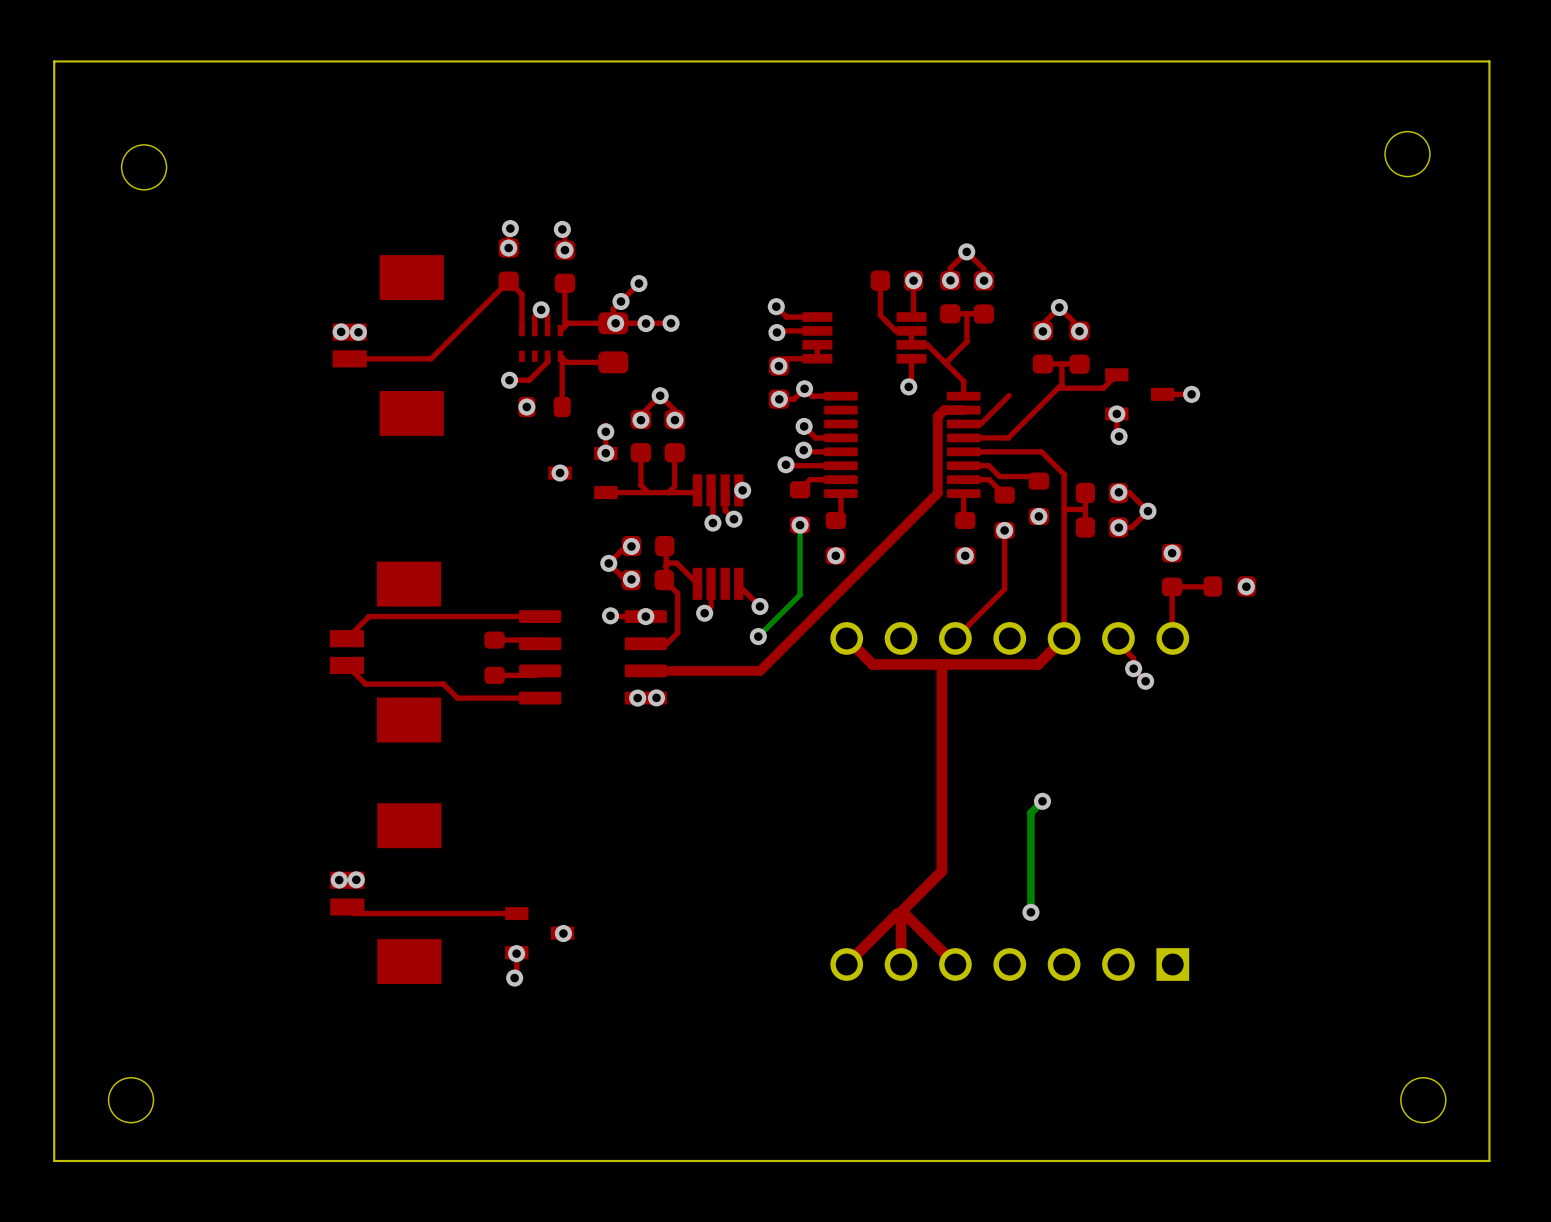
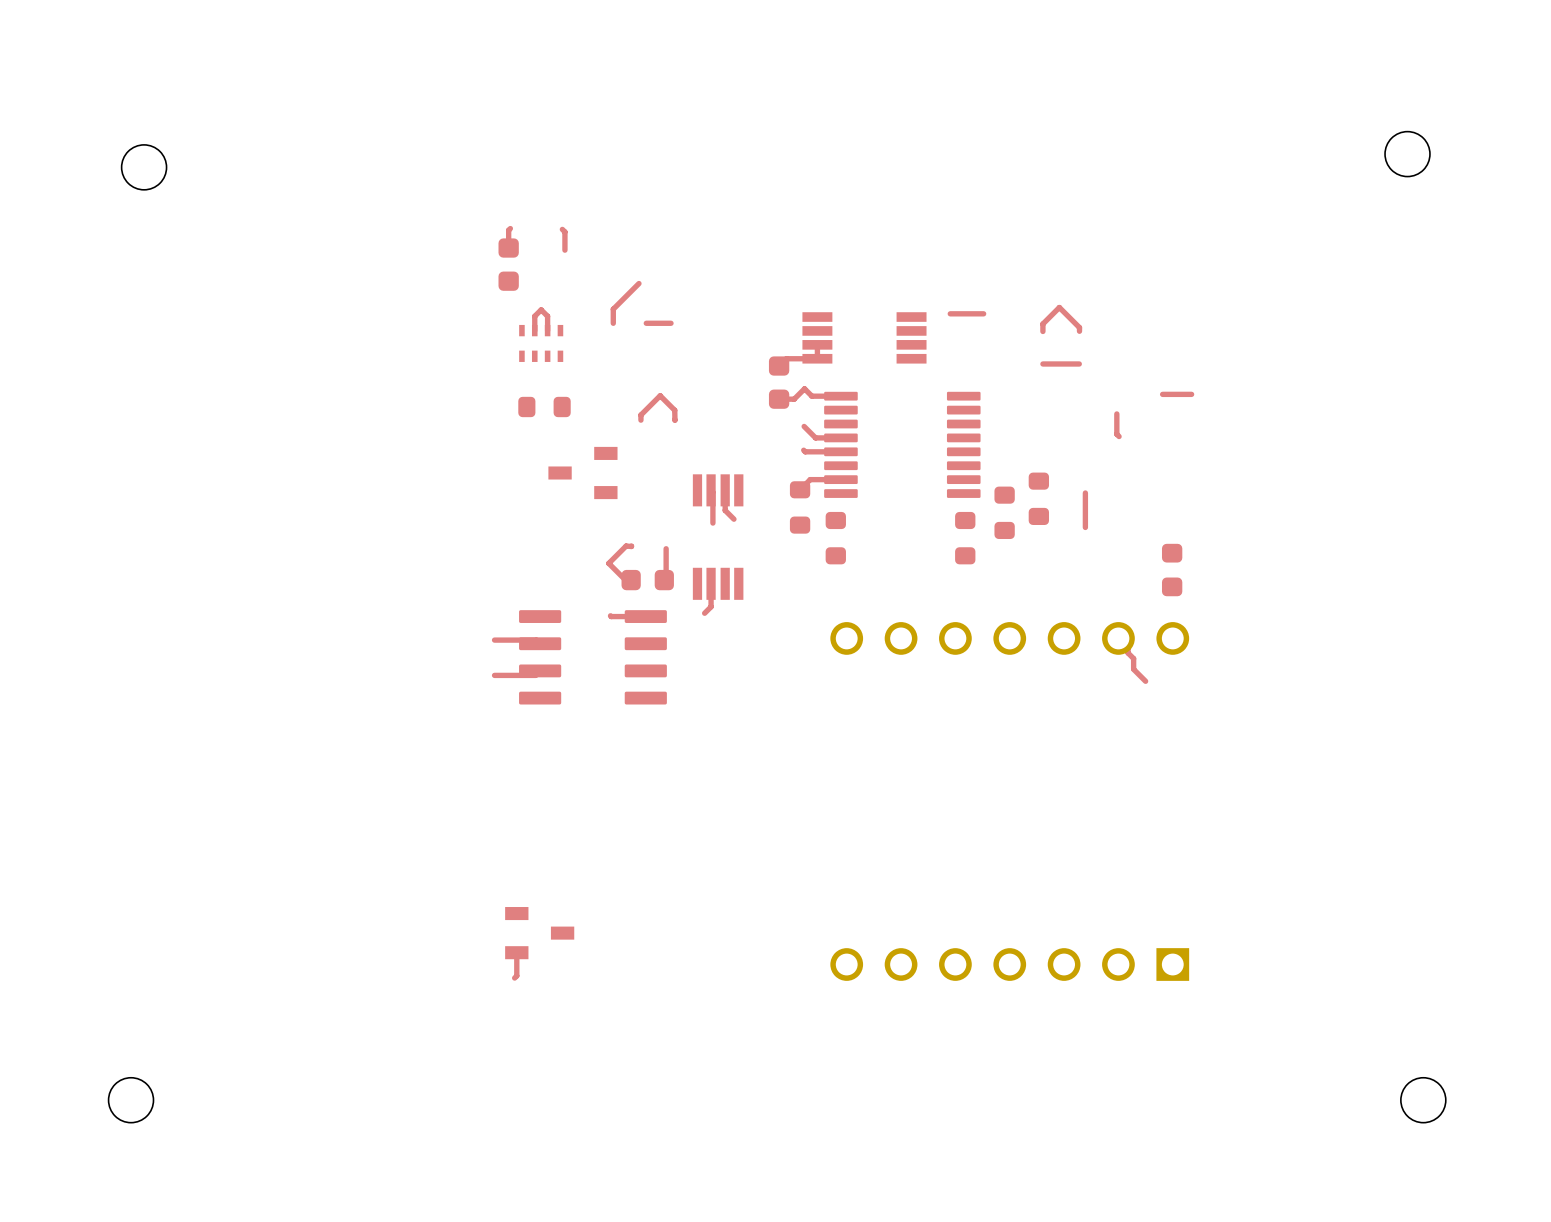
board edge: (1489, 61) (54, 61) (54, 1160) (1489, 1160) (1489, 61) -> none
via: (510, 228) -> none
via: (562, 229) -> none
via: (508, 248) -> none
via: (564, 250) -> none
via: (966, 251) -> none
part: (564, 266) -> none
top track: (880, 280) (880, 315) (895, 330) (911, 330) (911, 344) (927, 344) (963, 381) (963, 396) -> none
part: (896, 280) -> none
top track: (913, 280) (913, 314) (911, 317) -> none
via: (913, 280) -> none
top track: (950, 280) (950, 268) (966, 251) (983, 268) (984, 280) -> none
via: (950, 280) -> none
via: (984, 280) -> none
top track: (564, 283) (564, 326) -> none
via: (638, 283) -> none
part: (950, 297) -> none
part: (983, 297) -> none
via: (620, 301) -> none
top track: (776, 306) (786, 317) (817, 317) -> none
via: (776, 306) -> none
via: (1059, 307) -> none
via: (541, 309) -> none
top track: (966, 313) (966, 341) (945, 363) -> none
via: (615, 323) -> none
top track: (645, 323) (567, 323) (560, 330) -> none
via: (646, 323) -> none
via: (671, 323) -> none
top track: (521, 330) (521, 294) (508, 281) (431, 358) (349, 358) -> none
top track: (817, 330) (778, 330) (776, 332) -> none
via: (341, 331) -> none
via: (1042, 331) -> none
via: (1079, 331) -> none
via: (358, 332) -> none
via: (776, 332) -> none
part: (613, 342) -> none
part: (388, 345) -> none
part: (1042, 347) -> none
part: (1079, 347) -> none
top track: (547, 356) (547, 361) (529, 380) (509, 380) -> none
top track: (560, 356) (566, 362) (613, 362) -> none
top track: (562, 358) (562, 406) -> none
top track: (911, 358) (911, 384) (908, 386) -> none
top track: (1061, 363) (1061, 384) (1008, 437) (963, 437) -> none
via: (778, 366) -> none
top track: (1116, 374) (1103, 388) (1058, 388) -> none
via: (509, 380) -> none
via: (908, 386) -> none
via: (804, 388) -> none
part: (1139, 394) -> none
via: (1191, 394) -> none
via: (660, 395) -> none
top track: (1009, 395) (980, 424) (963, 424) -> none
via: (779, 399) -> none
via: (526, 406) -> none
top track: (963, 410) (944, 410) (937, 416) (937, 493) (760, 670) (645, 670) -> none
via: (1116, 413) -> none
via: (640, 420) -> none
via: (674, 420) -> none
via: (804, 426) -> none
via: (605, 431) -> none
part: (640, 436) -> none
part: (674, 436) -> none
via: (1119, 436) -> none
via: (803, 450) -> none
top track: (963, 451) (1041, 451) (1064, 474) (1064, 638) (1038, 664) (872, 664) (846, 638) -> none
top track: (640, 452) (640, 485) (648, 492) -> none
top track: (674, 452) (674, 486) (668, 492) -> none
via: (605, 453) -> none
top track: (785, 464) (840, 465) -> none
via: (785, 464) -> none
top track: (963, 465) (988, 465) (999, 476) (1034, 476) (1038, 481) -> none
via: (560, 473) -> none
top track: (963, 479) (989, 479) (1004, 495) -> none
top track: (697, 490) (695, 492) (605, 492) -> none
via: (742, 490) -> none
via: (1118, 492) -> none
top track: (840, 493) (840, 515) (835, 520) -> none
top track: (963, 493) (965, 520) -> none
part: (1101, 493) -> none
top track: (1118, 493) (1129, 493) (1147, 511) (1131, 527) (1119, 527) -> none
top track: (1064, 509) (1085, 509) -> none
via: (1147, 511) -> none
via: (1038, 516) -> none
via: (733, 519) -> none
via: (712, 523) -> none
bottom track: (800, 525) (800, 594) (758, 636) -> none
via: (800, 525) -> none
part: (1101, 527) -> none
via: (1118, 527) -> none
top track: (1004, 530) (1004, 589) (955, 638) -> none
via: (1004, 530) -> none
via: (631, 546) -> none
part: (648, 546) -> none
via: (1172, 553) -> none
via: (835, 555) -> none
via: (965, 555) -> none
via: (608, 563) -> none
top track: (666, 566) (669, 563) (676, 563) (697, 583) -> none
via: (631, 579) -> none
top track: (664, 580) (677, 593) (677, 632) (666, 643) (645, 643) -> none
top track: (738, 583) (759, 606) -> none
top track: (1212, 586) (1172, 586) (1172, 638) -> none
part: (1229, 586) -> none
via: (1246, 586) -> none
via: (759, 606) -> none
via: (704, 613) -> none
via: (610, 615) -> none
top track: (540, 616) (369, 616) (346, 638) -> none
via: (645, 616) -> none
via: (758, 636) -> none
part: (385, 652) -> none
part: (494, 657) -> none
top track: (941, 664) (941, 871) (899, 913) (901, 915) (901, 964) -> none
top track: (346, 665) (365, 684) (443, 684) (457, 698) (540, 698) -> none
via: (1133, 668) -> none
via: (1145, 681) -> none
via: (656, 697) -> none
via: (637, 698) -> none
bottom track: (1042, 801) (1030, 812) (1030, 912) -> none
via: (1042, 801) -> none
via: (356, 879) -> none
via: (339, 880) -> none
part: (385, 893) -> none
top track: (347, 907) (353, 913) (516, 913) -> none
via: (1030, 912) -> none
via: (563, 933) -> none
via: (516, 953) -> none
top track: (955, 964) (904, 913) (897, 913) (846, 964) -> none
via: (514, 978) -> none

